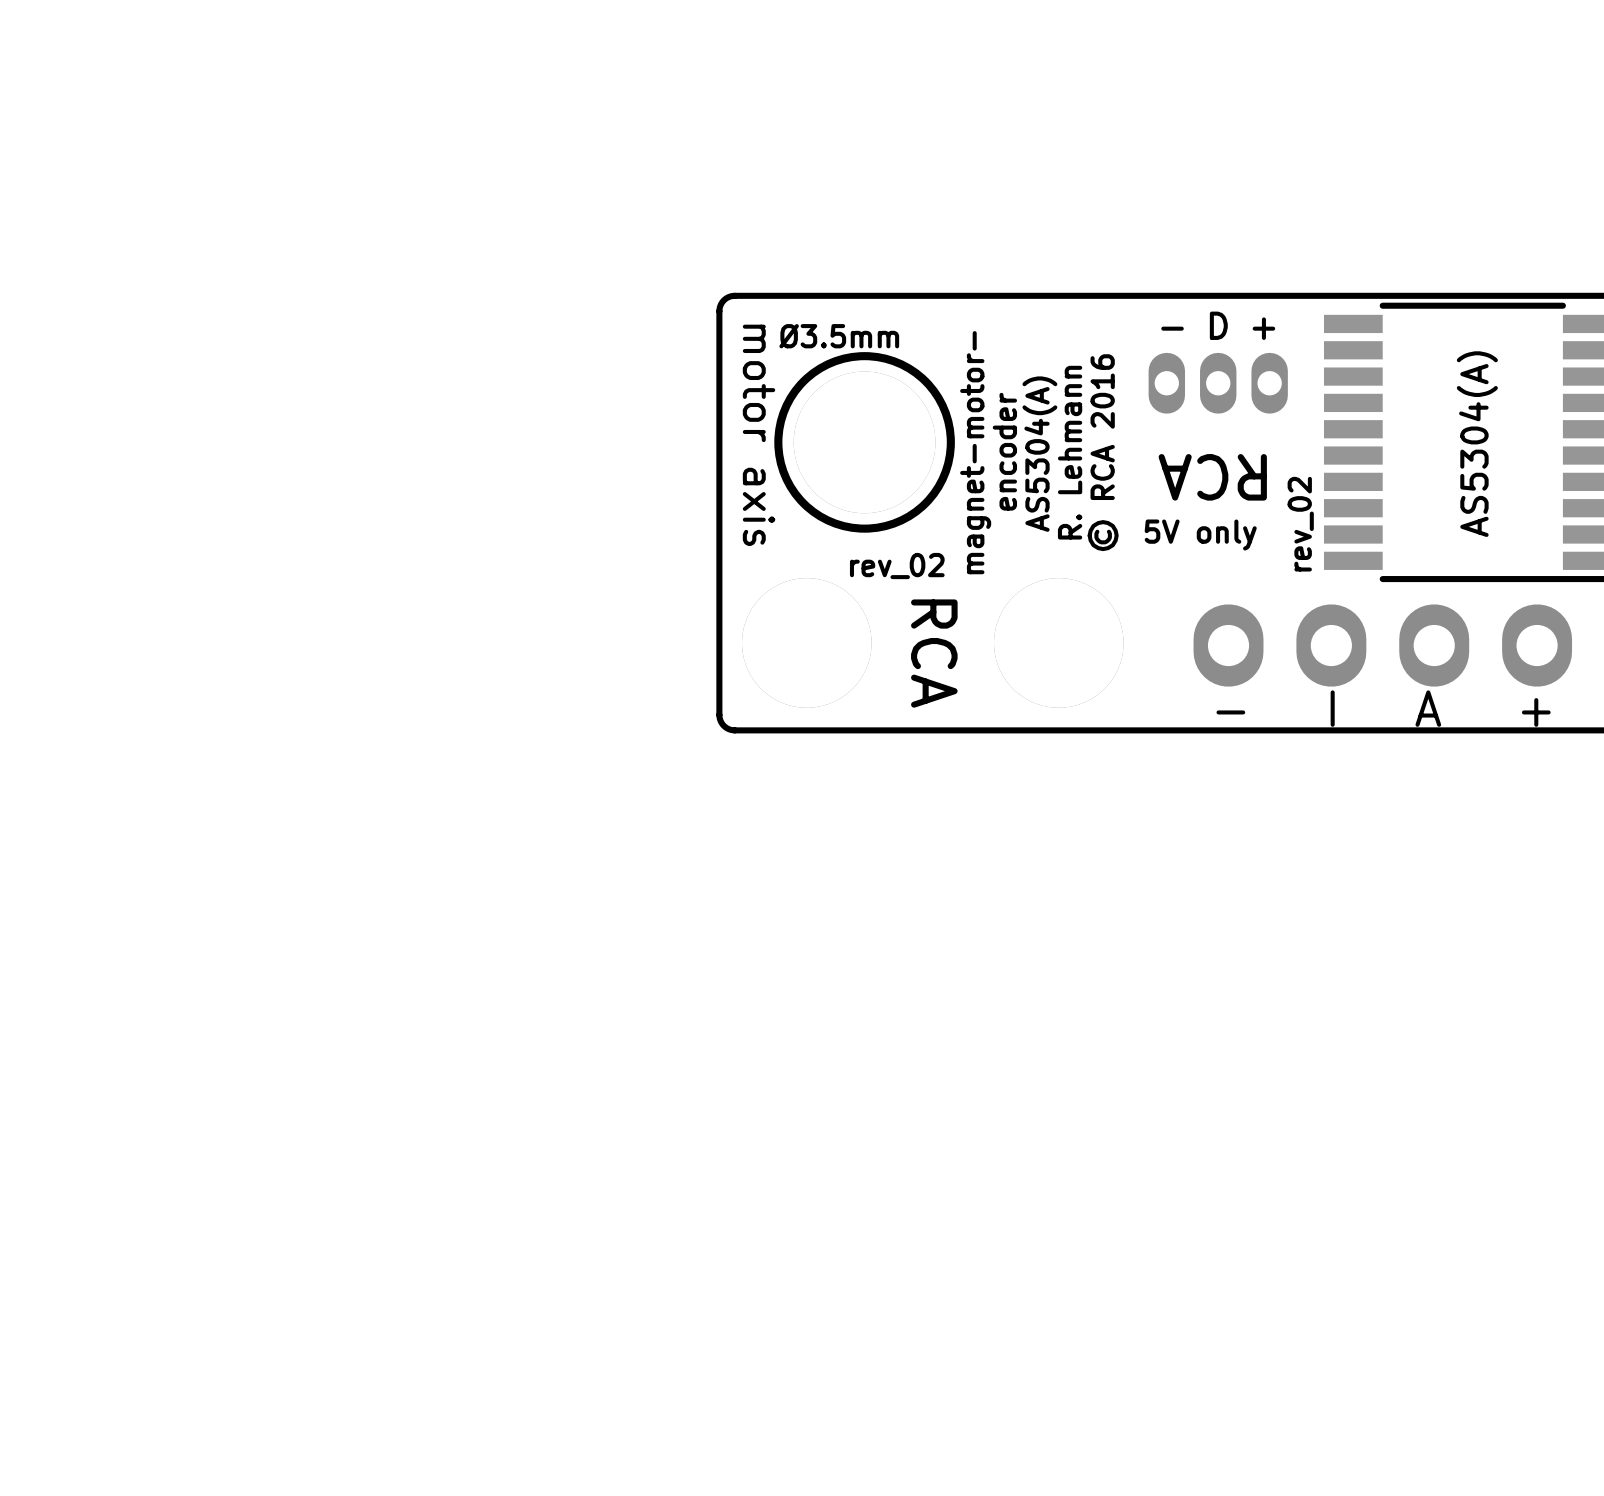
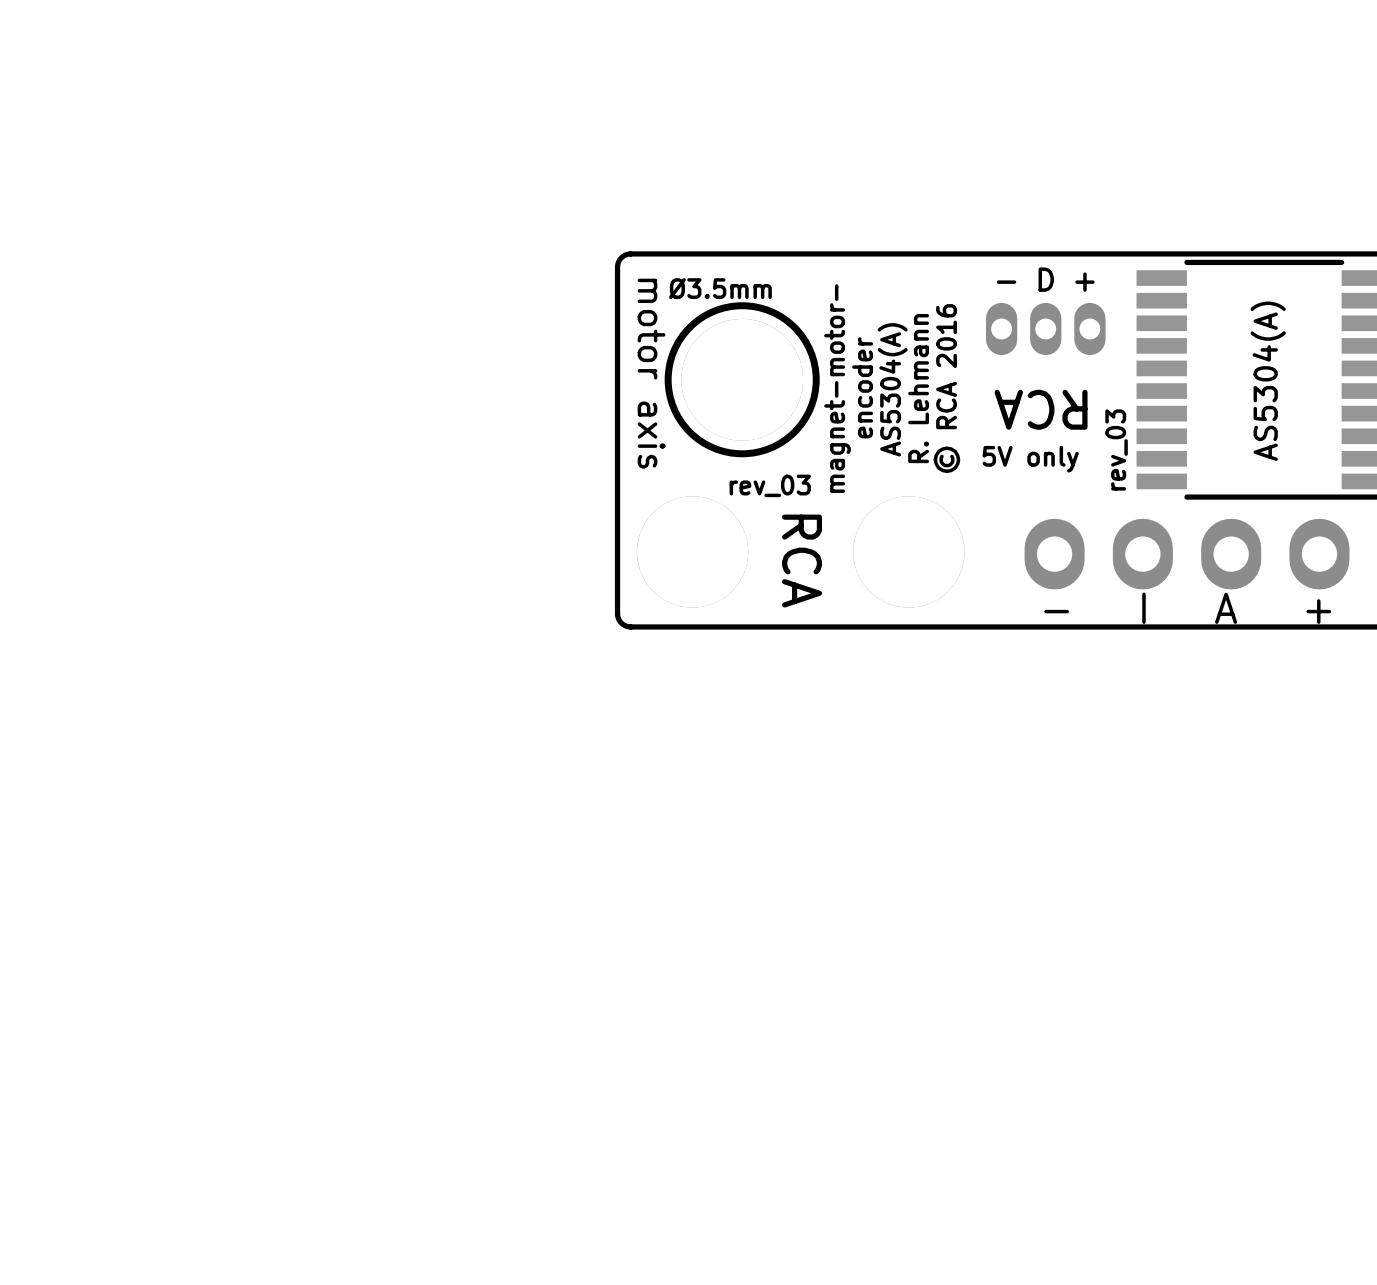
text: rev_02 (1300, 524) -> rev_03 (1116, 449)
text: rev_02 (897, 566) -> rev_03 (770, 485)

